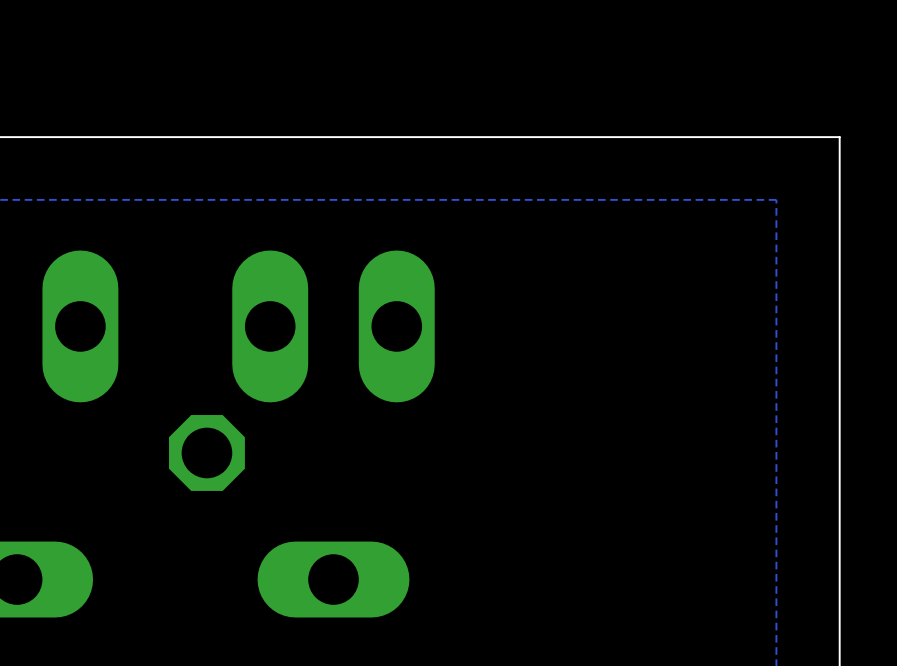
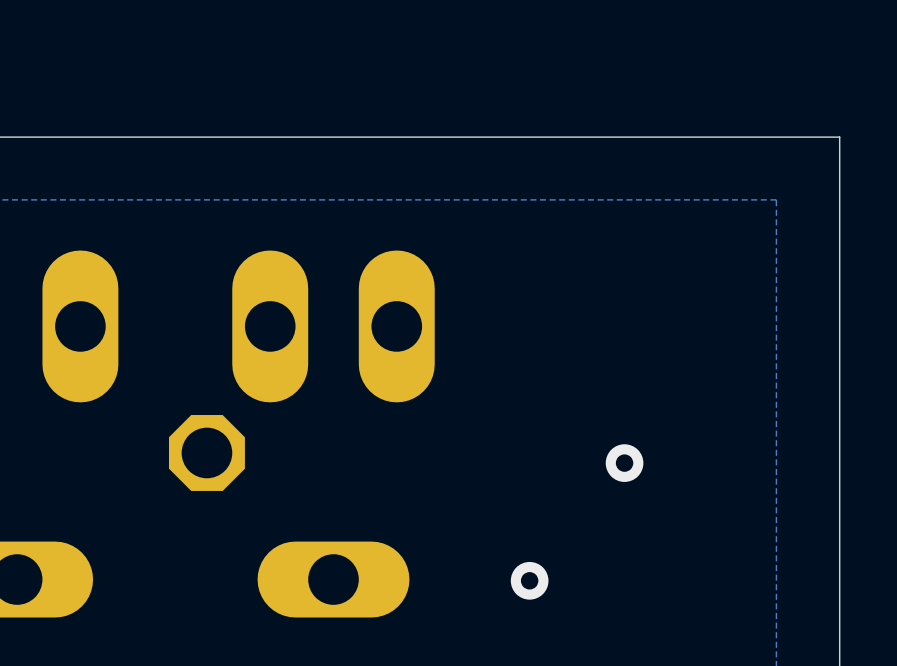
via: none -> (624, 463)
via: none -> (529, 580)

